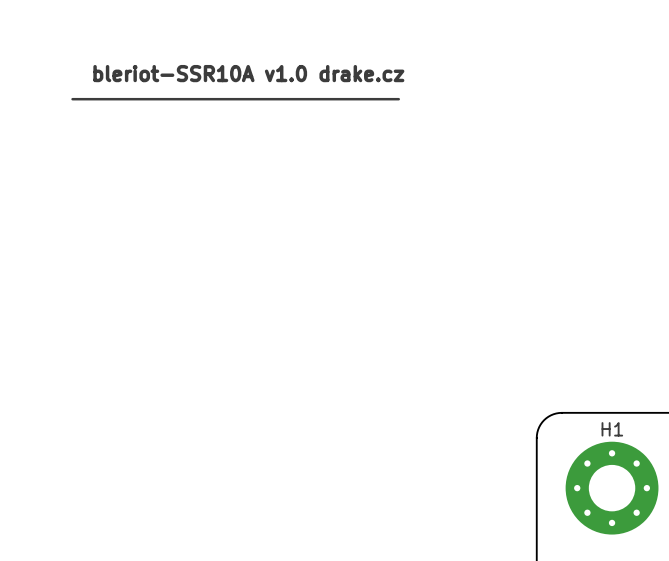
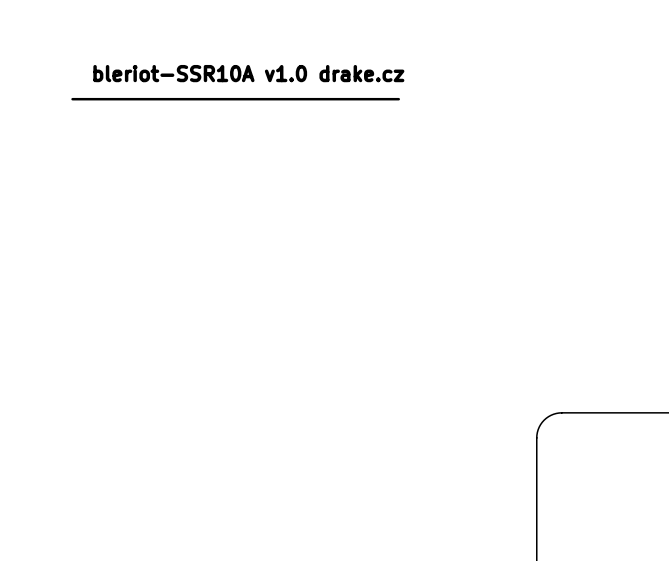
H1: (612, 488) -> none

